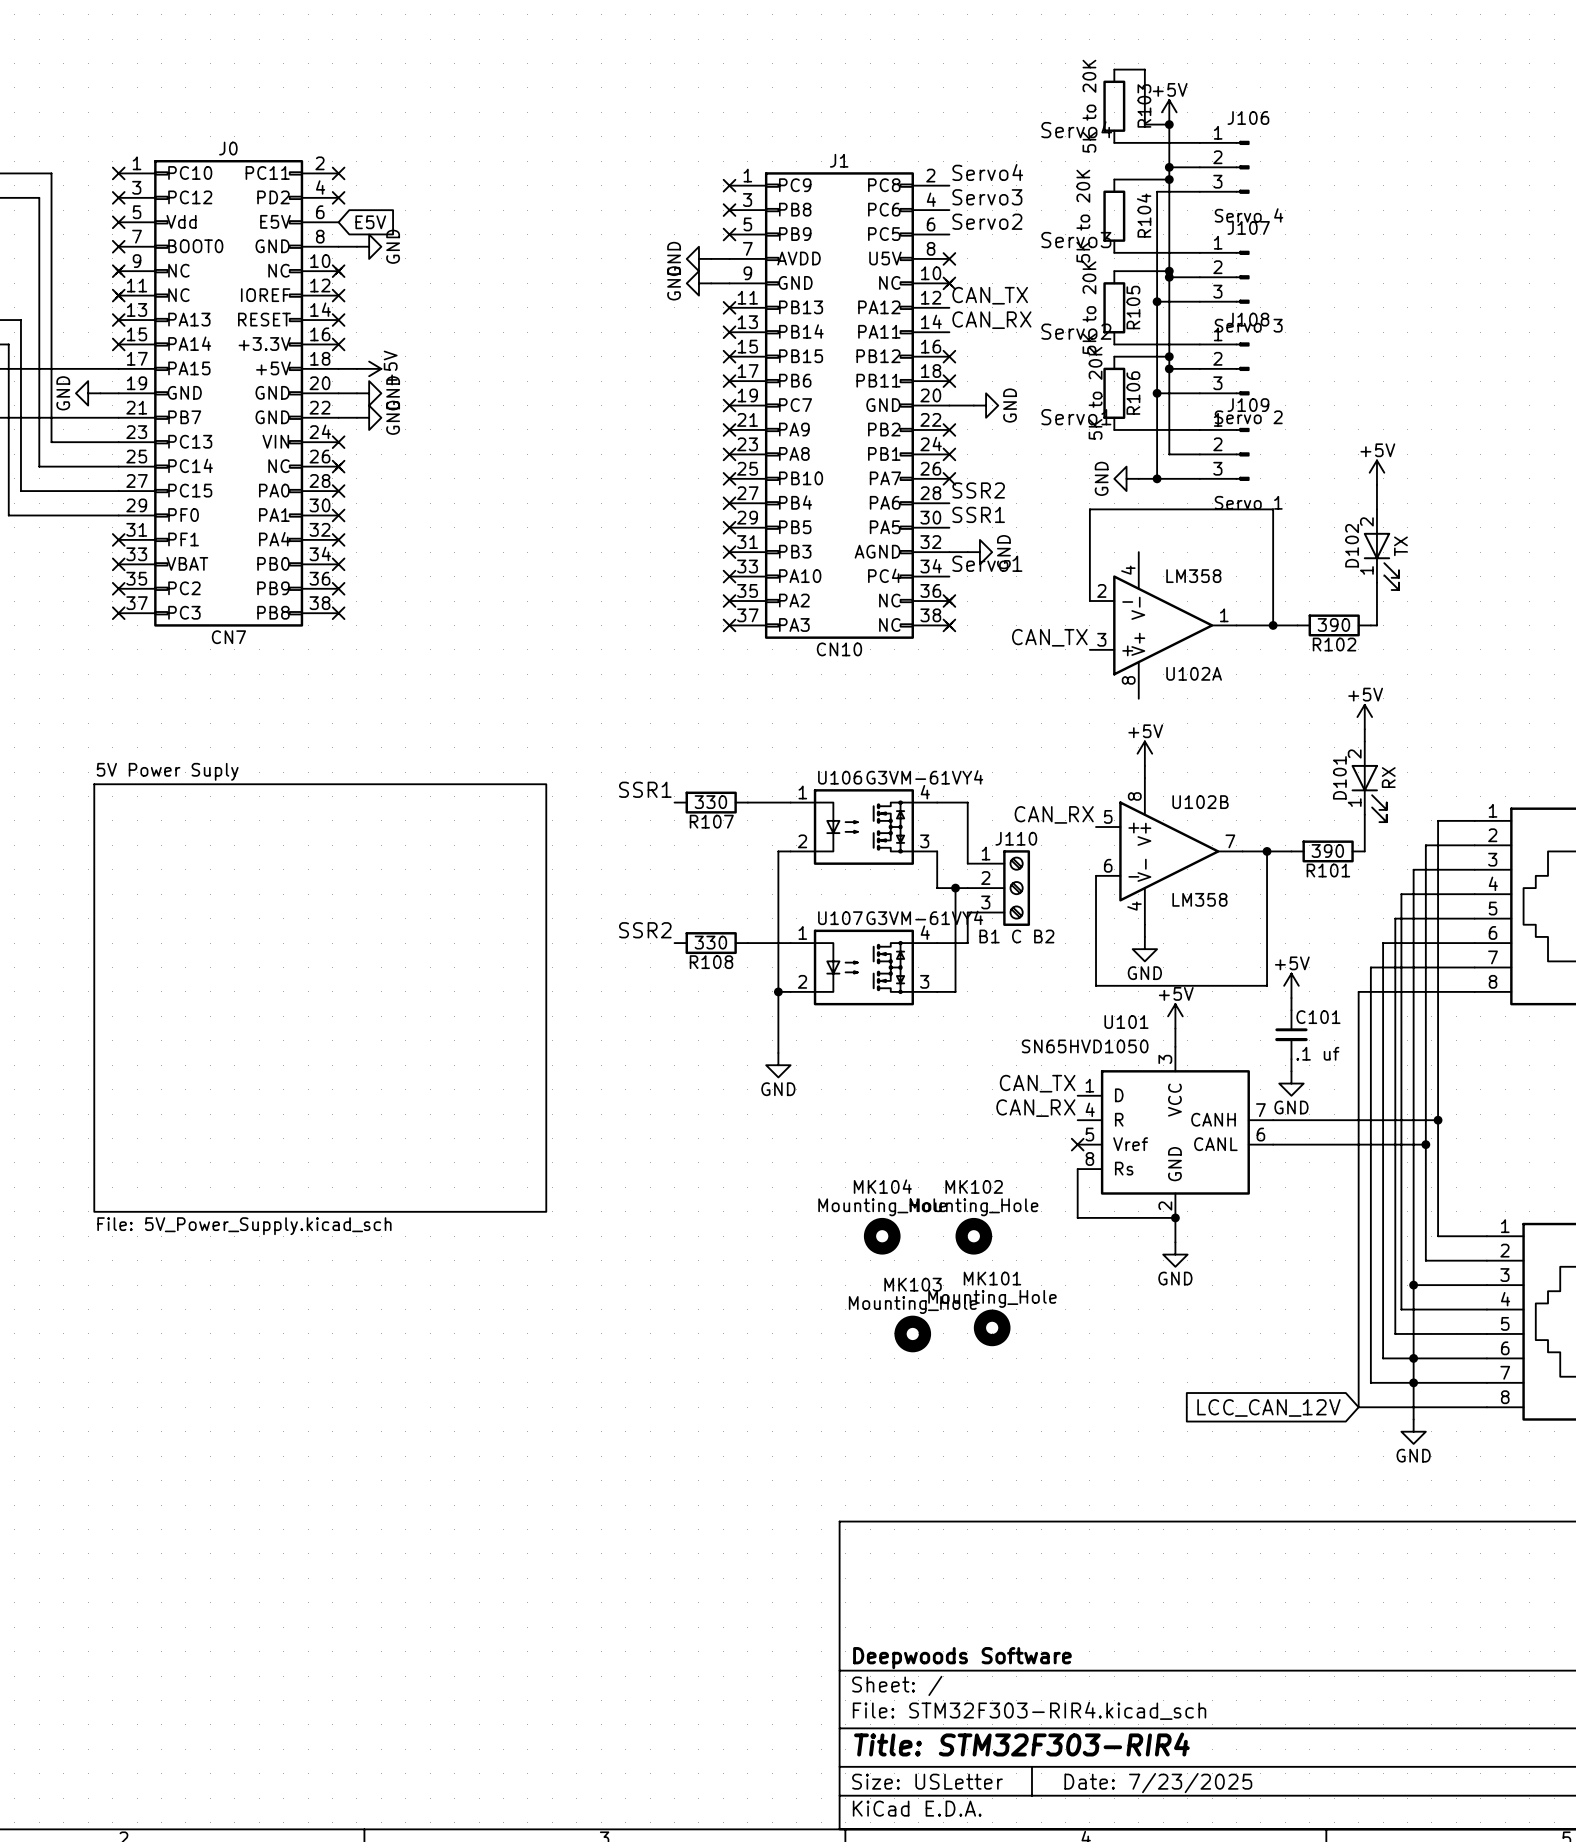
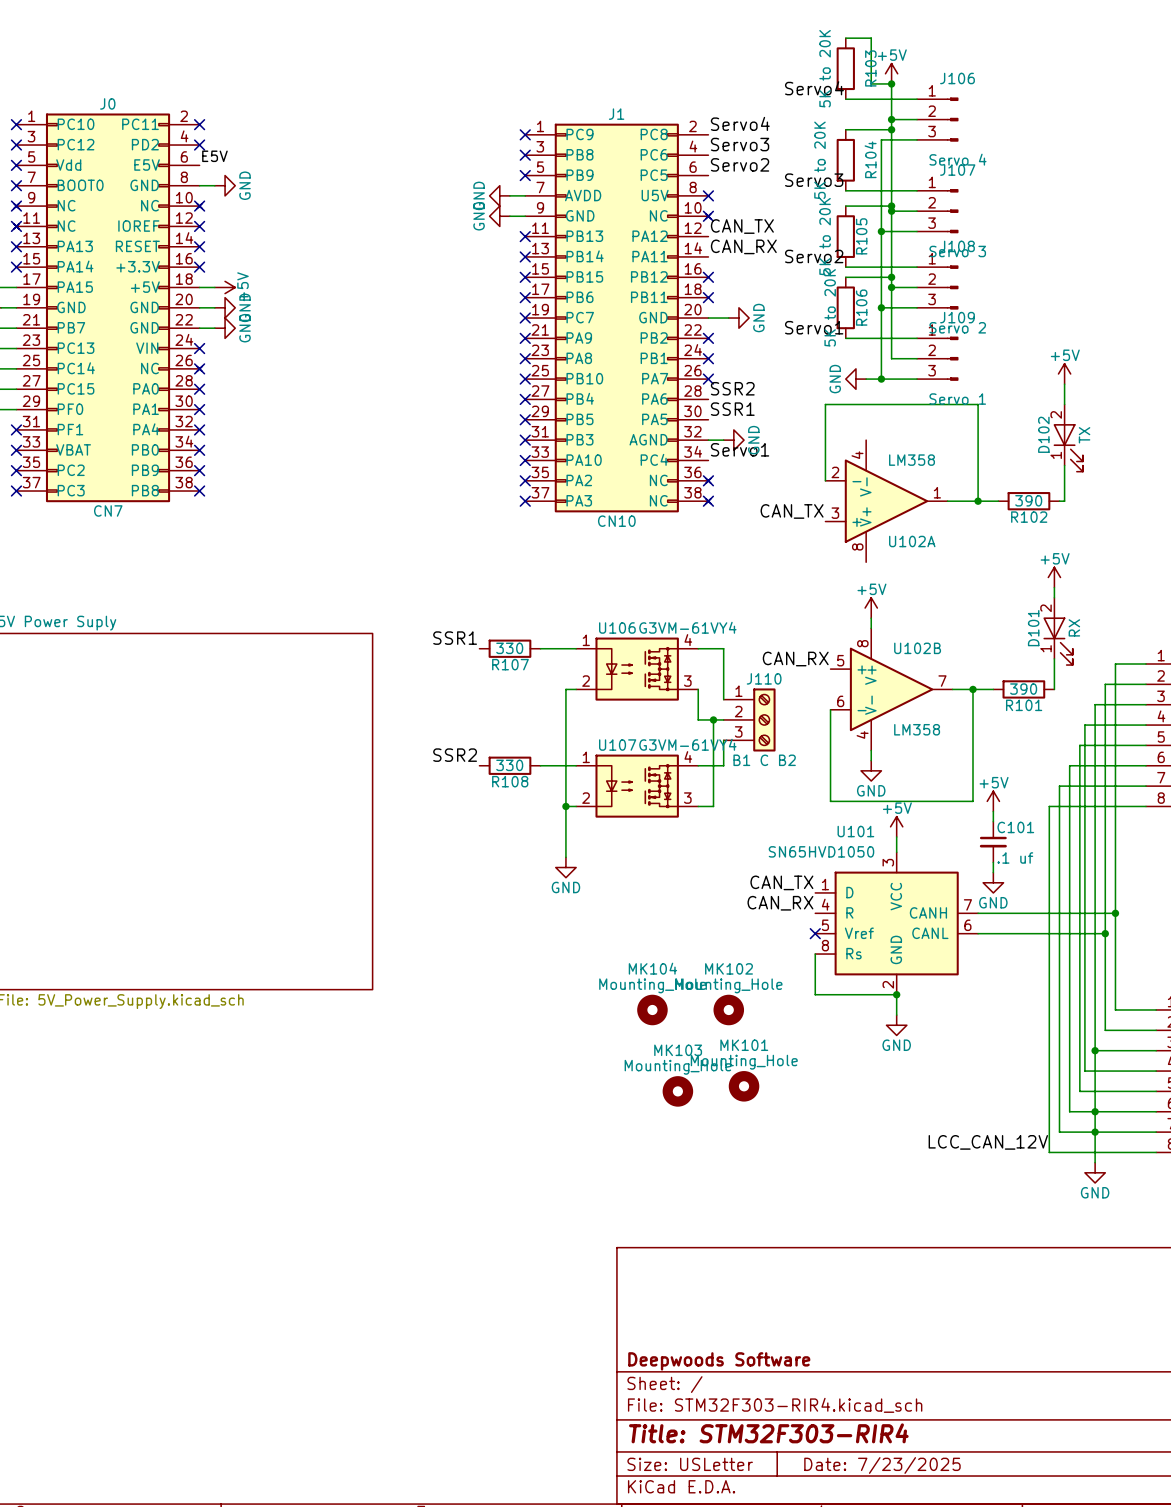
label: none -> E5V (214, 156)
global label: E5V (370, 222) -> none
label: none -> LCC_CAN_12V (988, 1142)
global label: LCC_CAN_12V (1268, 1407) -> none

